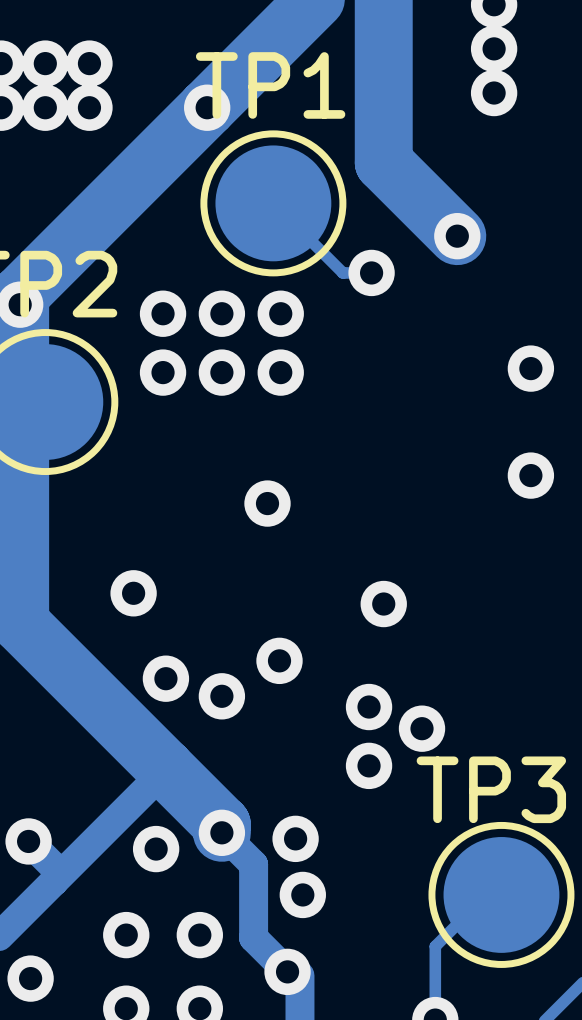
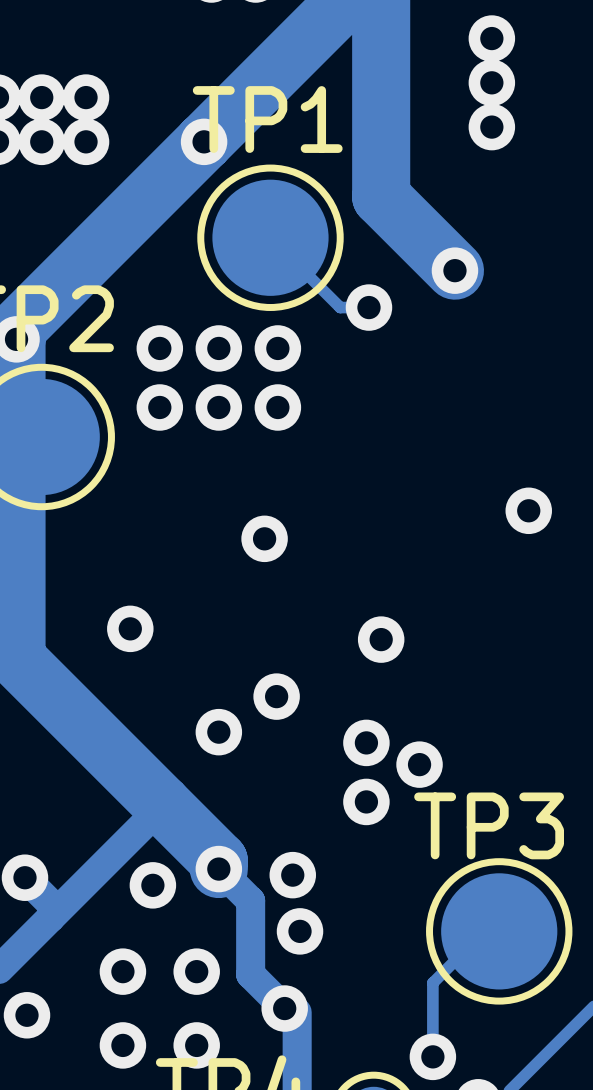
via: (530, 368) -> none
via: (165, 678) -> none

